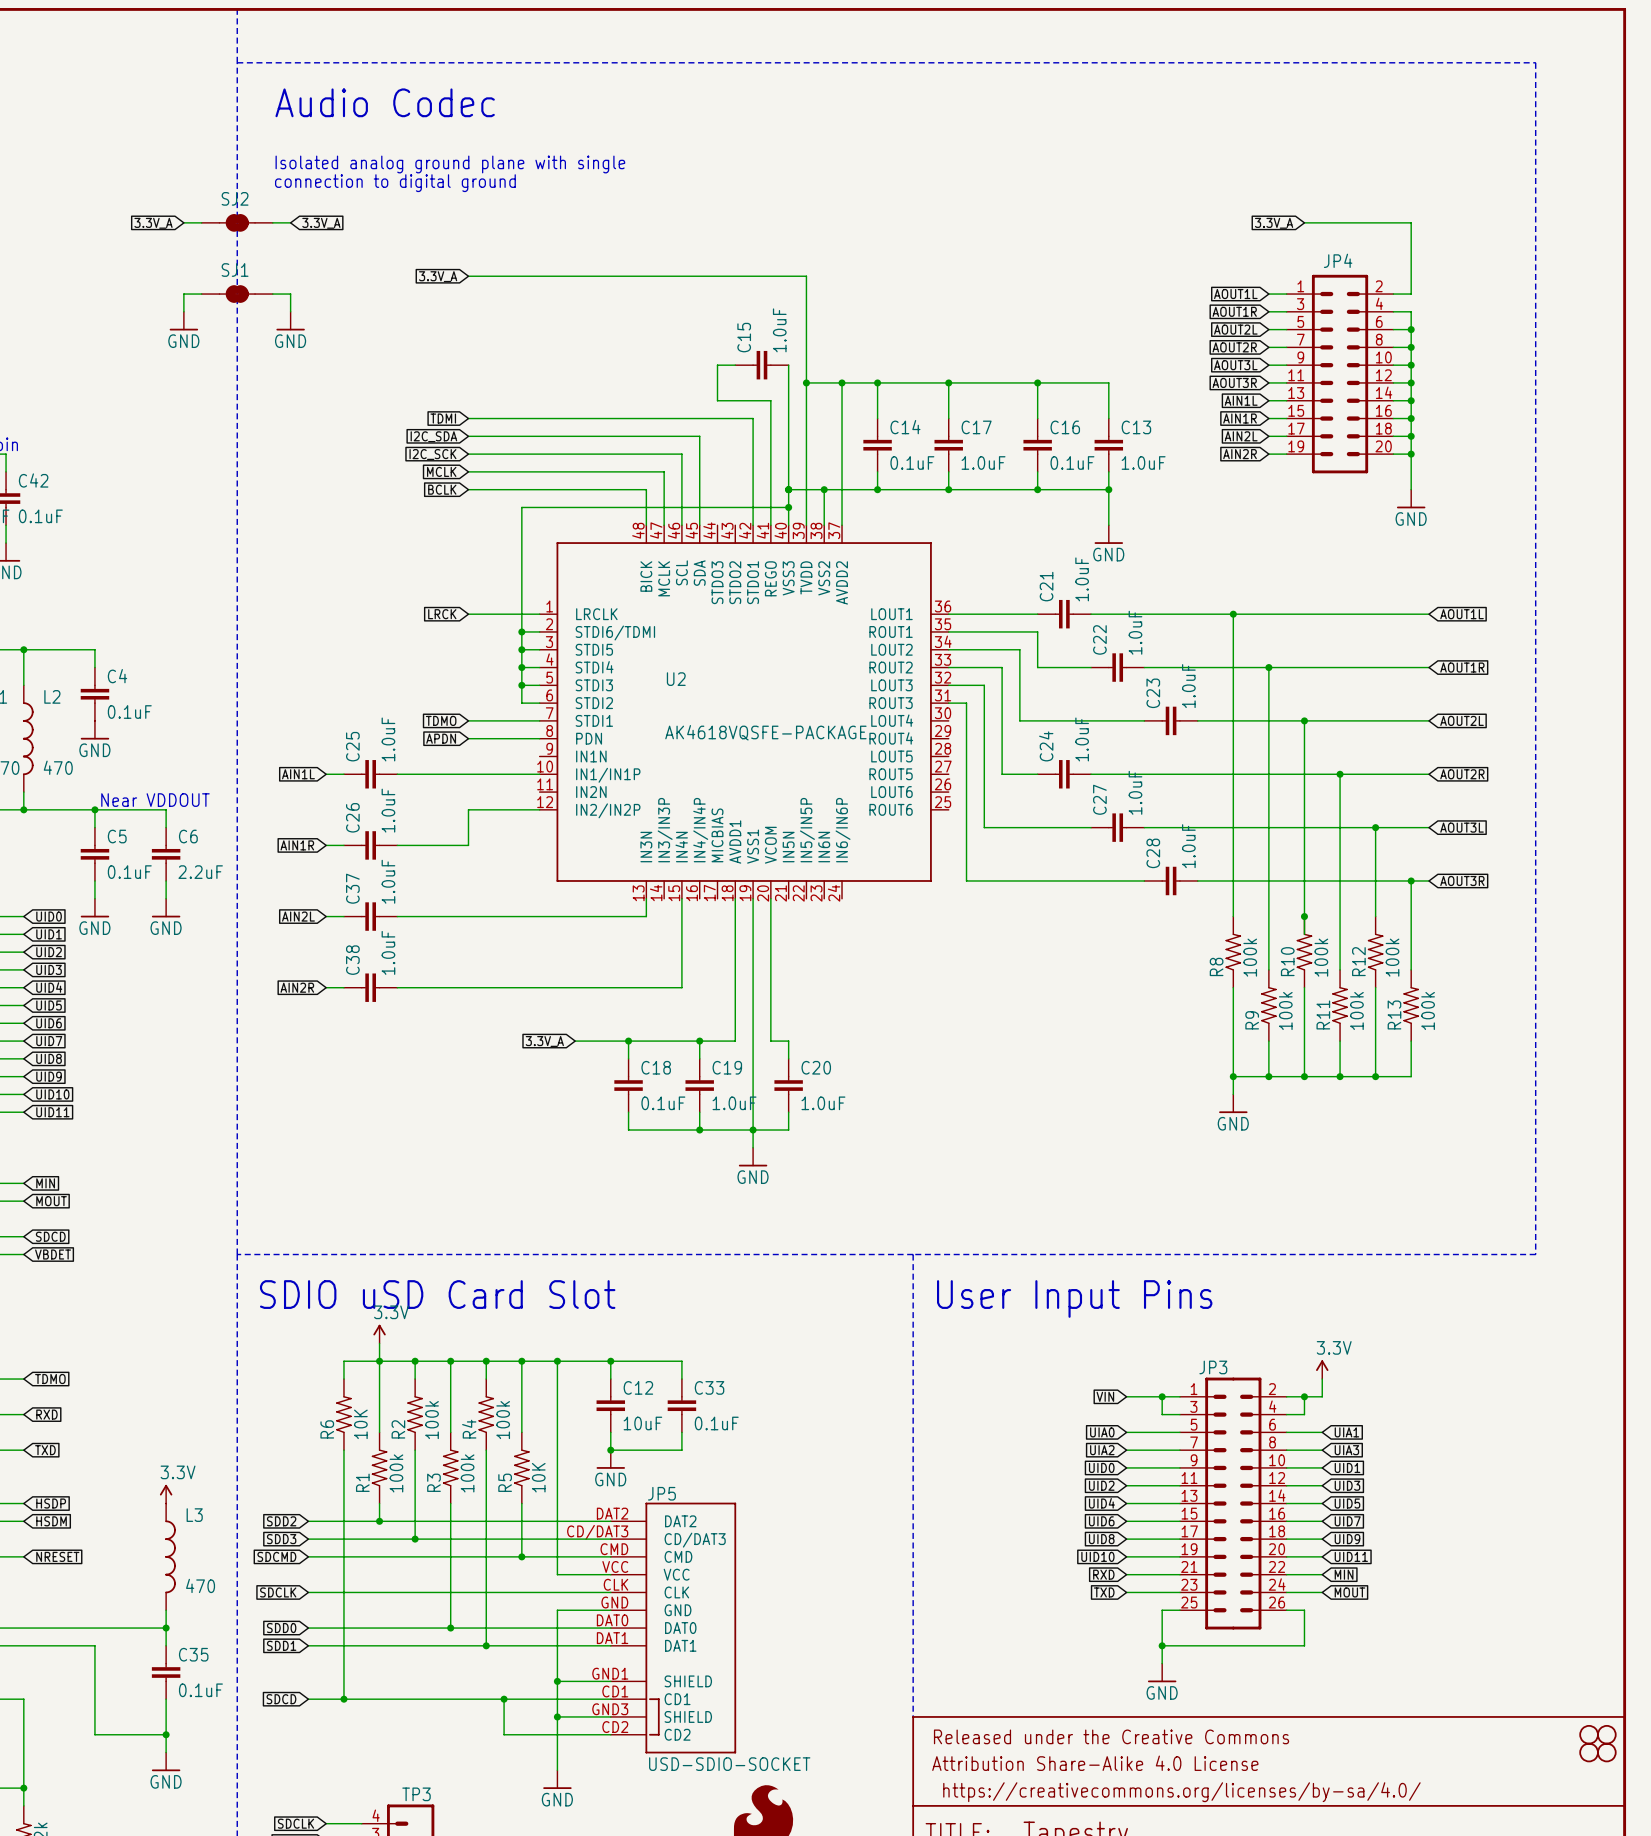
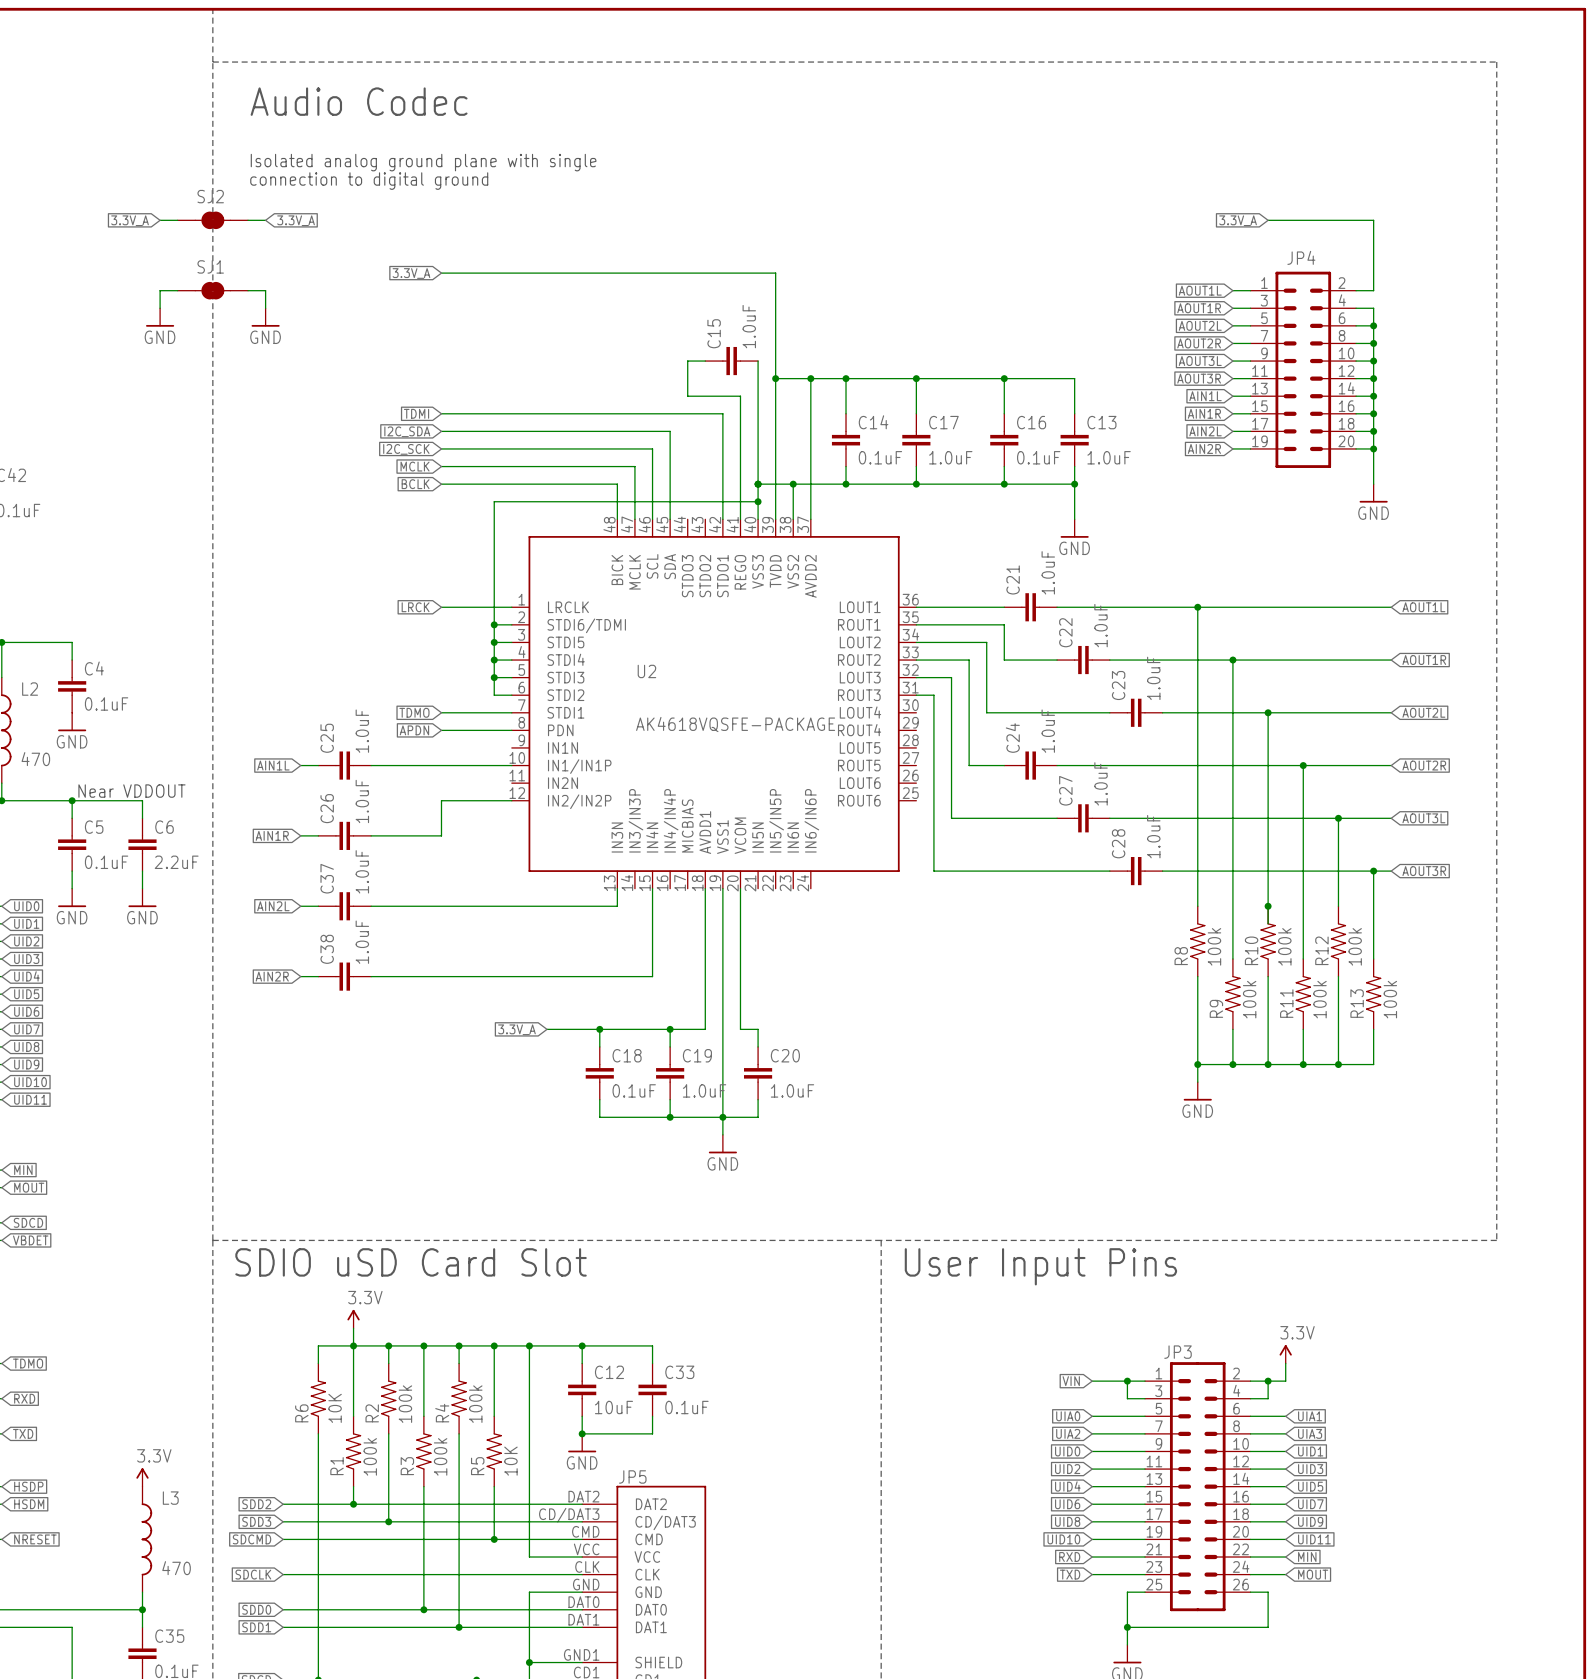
text position: SDIO uSD Card Slot (437, 1294) -> SDIO uSD Card Slot (411, 1262)
text position: User Input Pins (1074, 1298) -> User Input Pins (1040, 1266)

